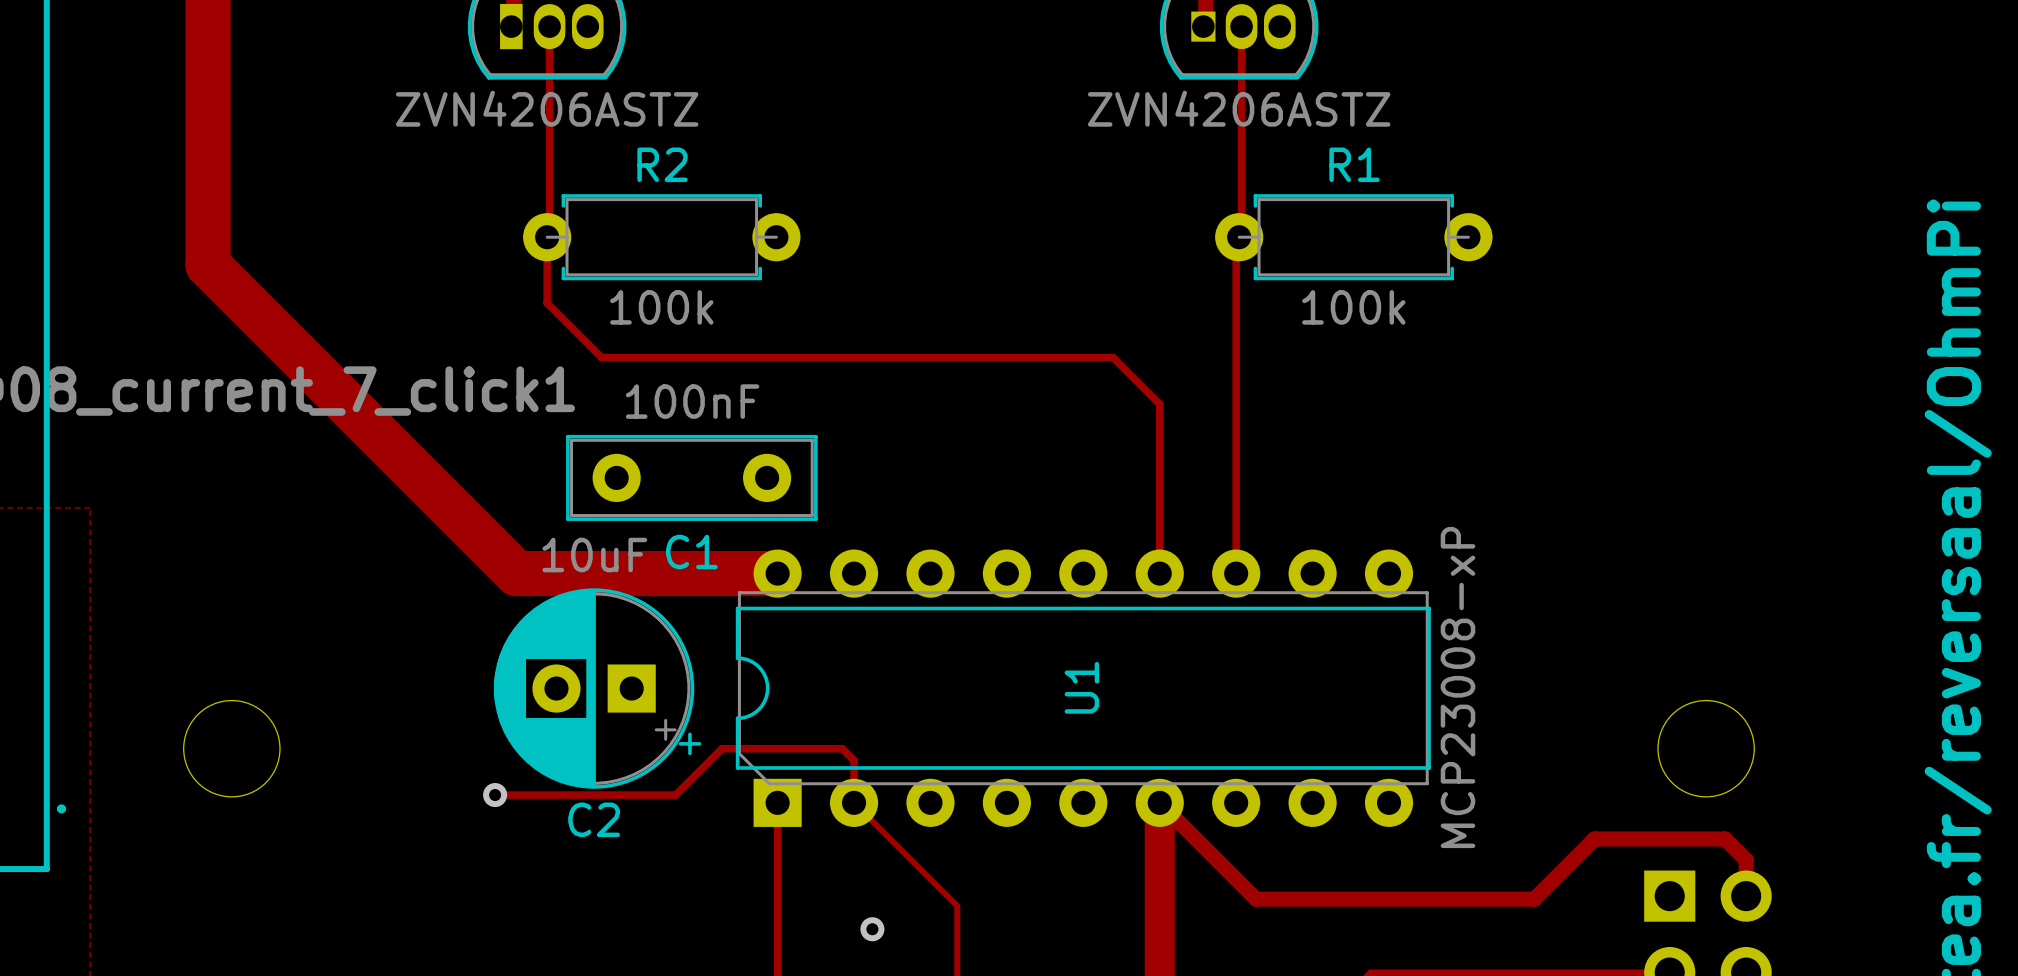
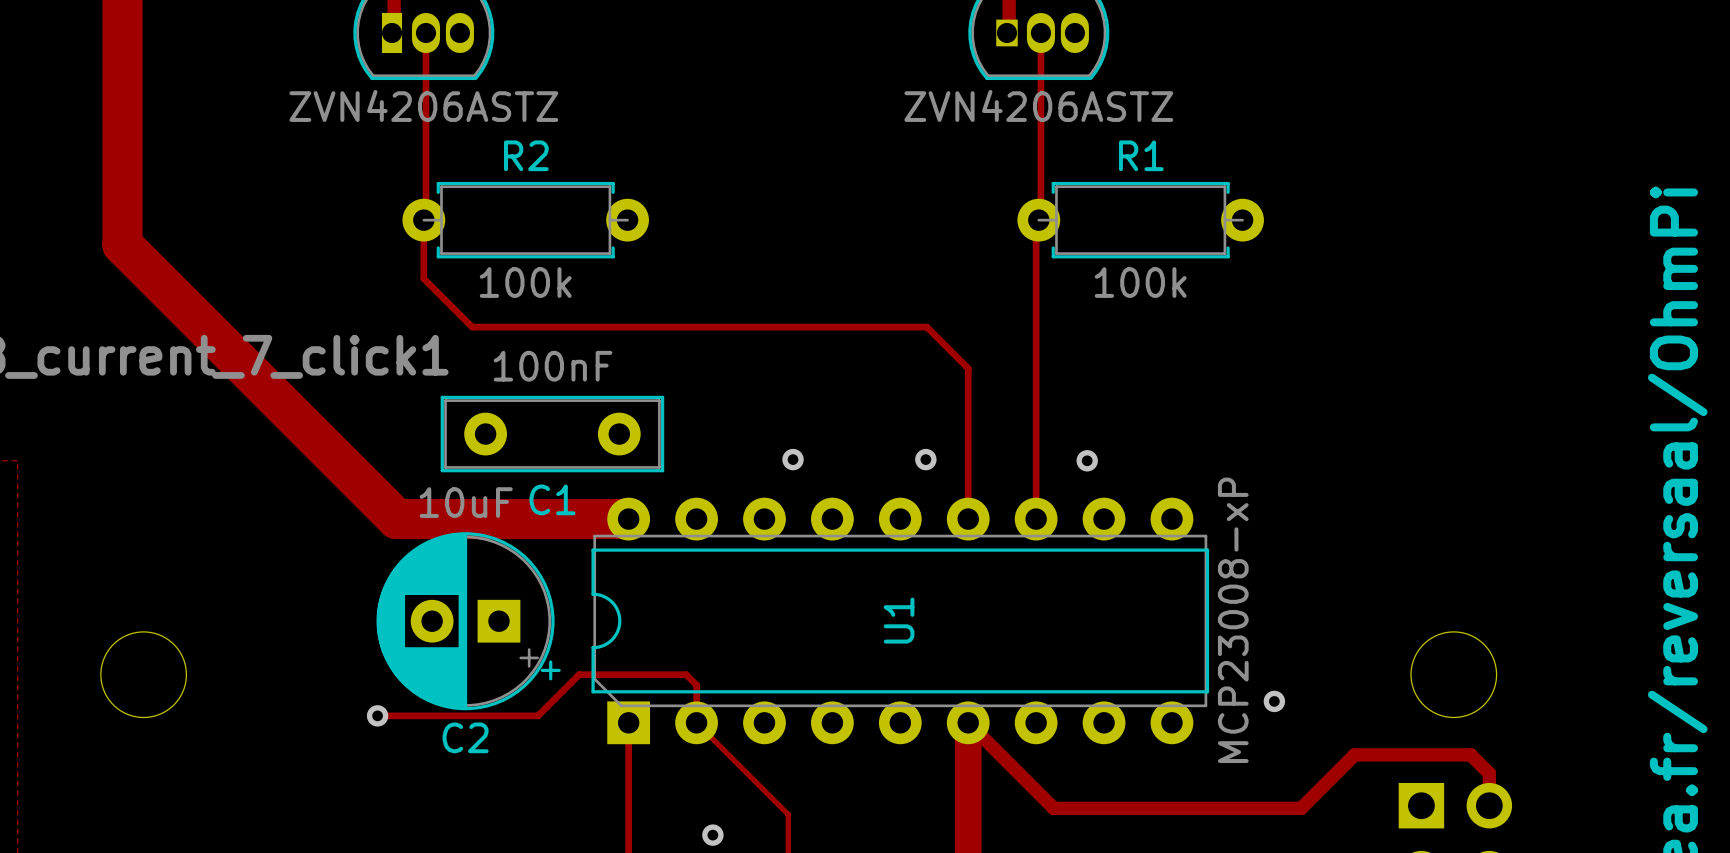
via: none -> (793, 459)
via: none -> (925, 459)
via: none -> (1087, 460)
via: none -> (1274, 701)

